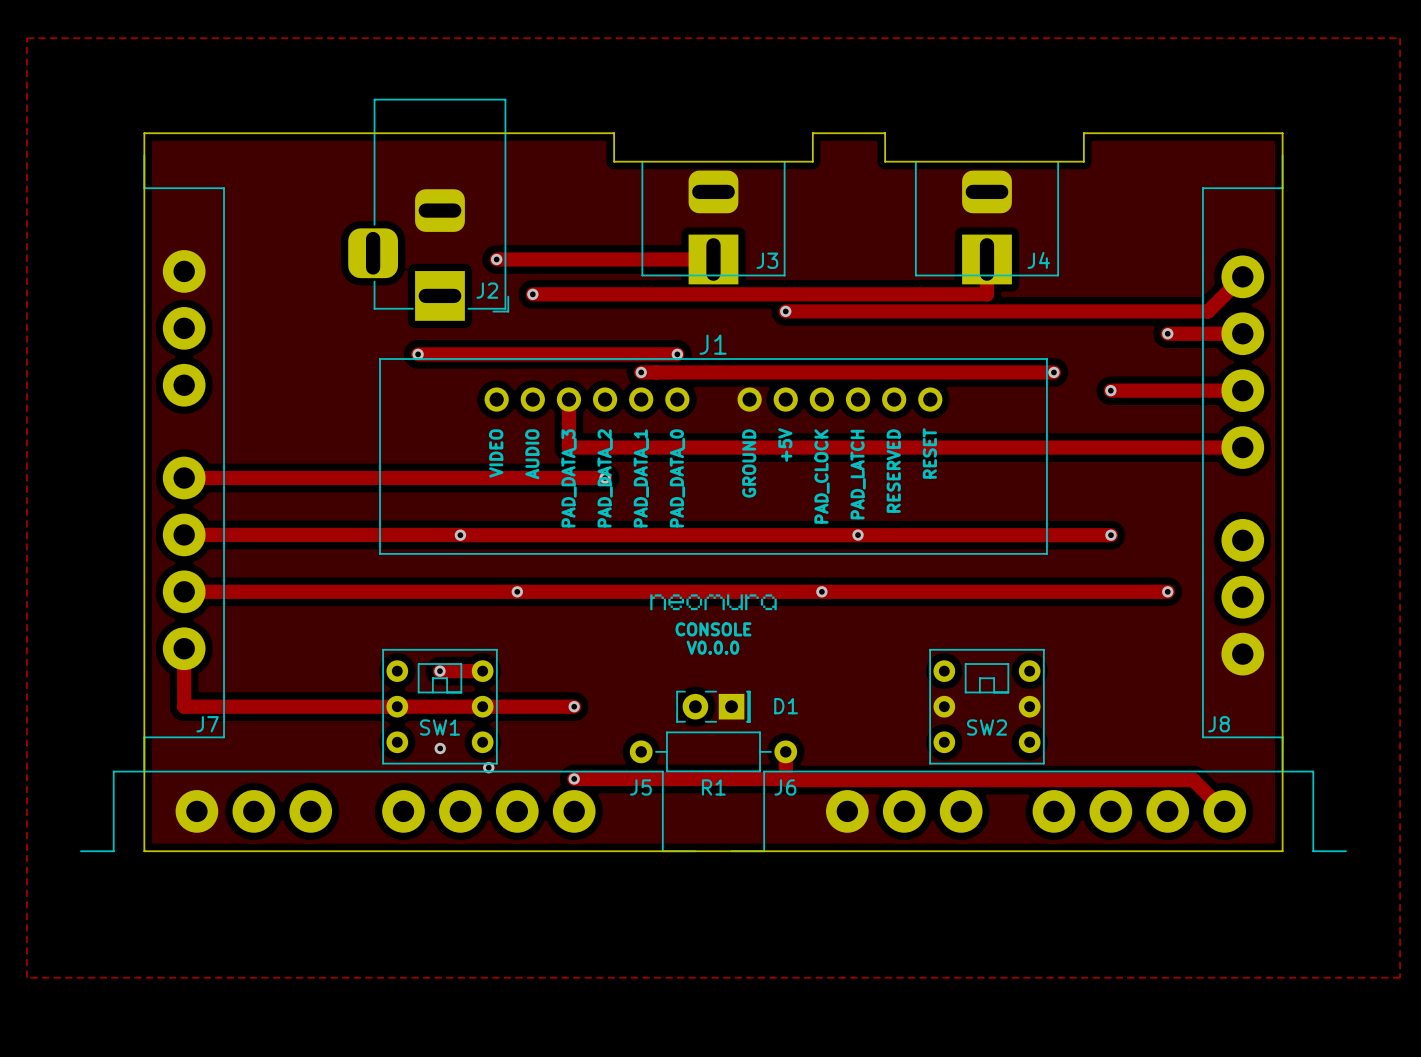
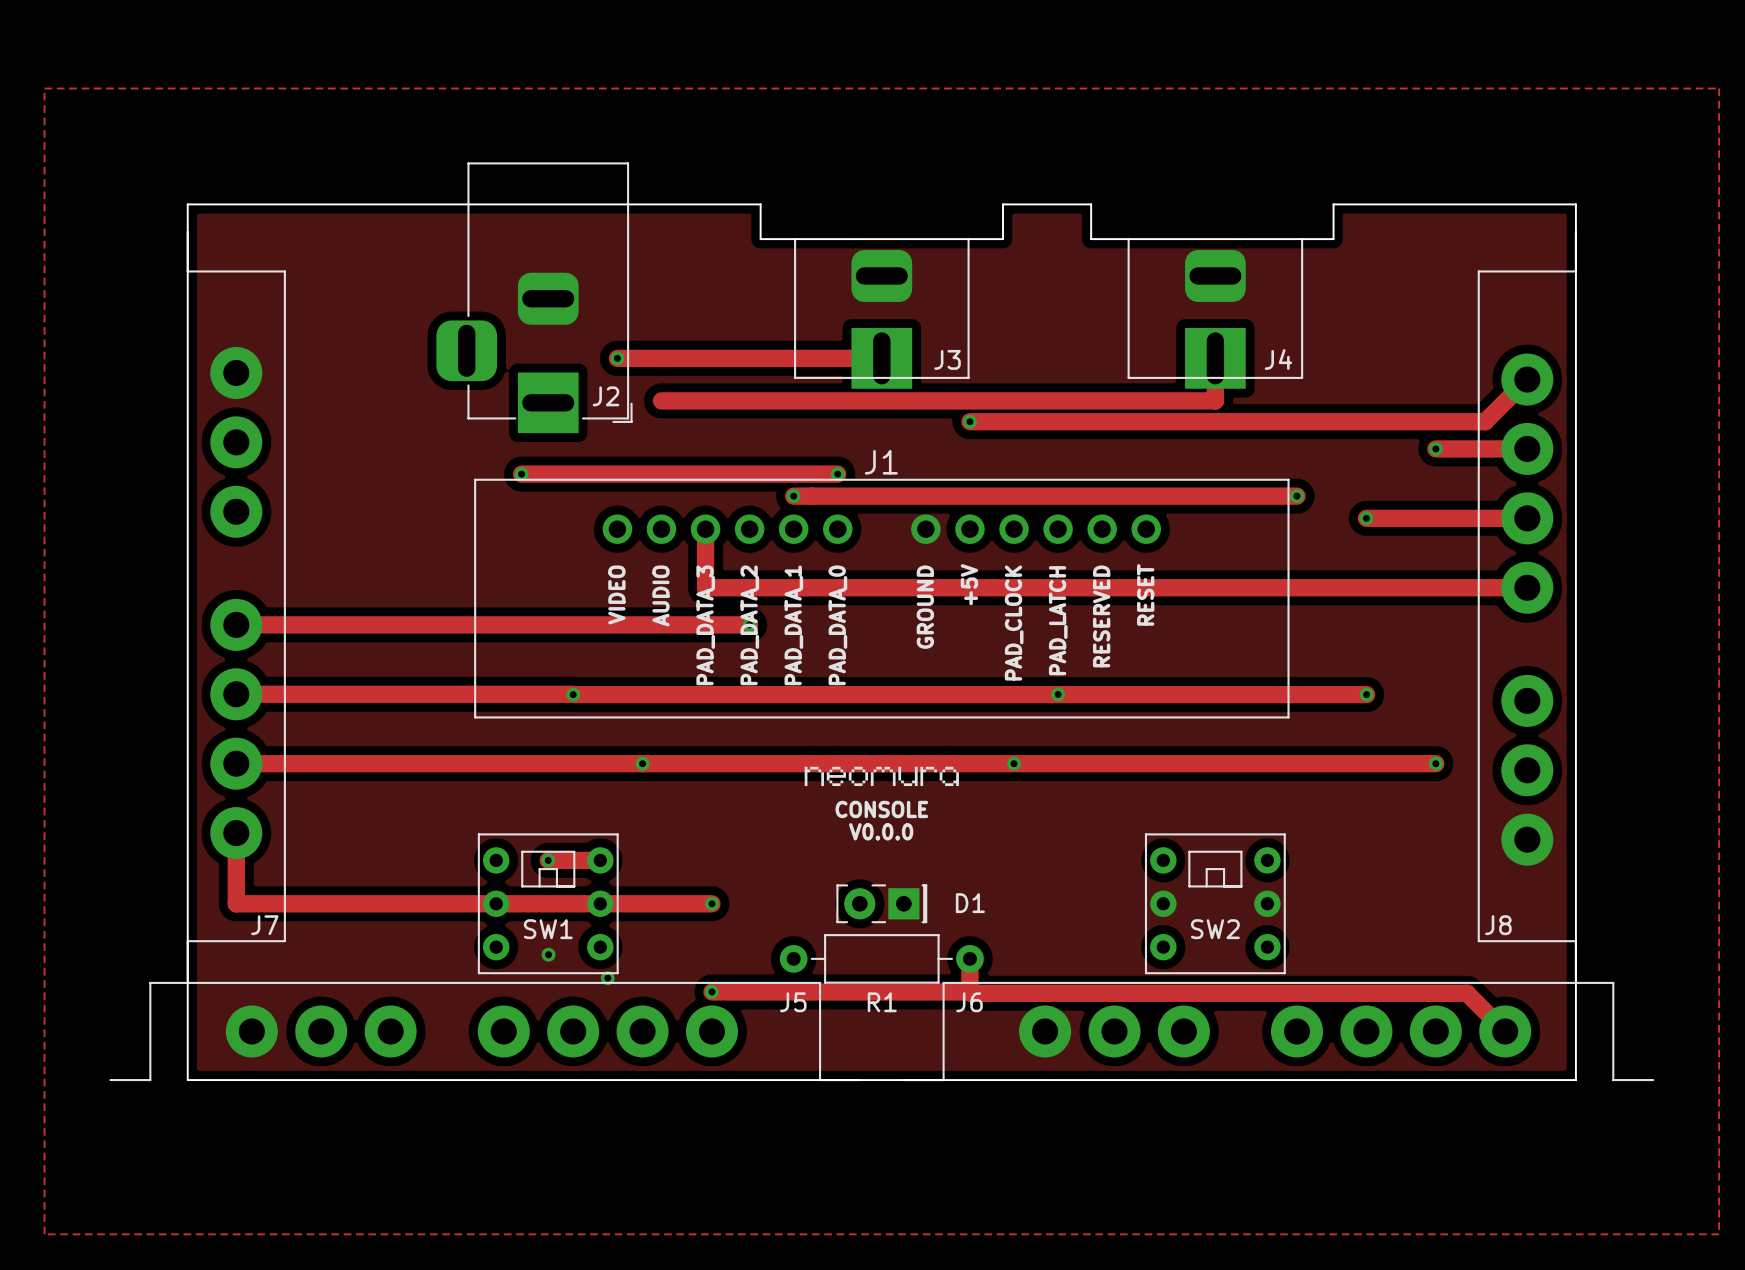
via: (532, 294) -> none

